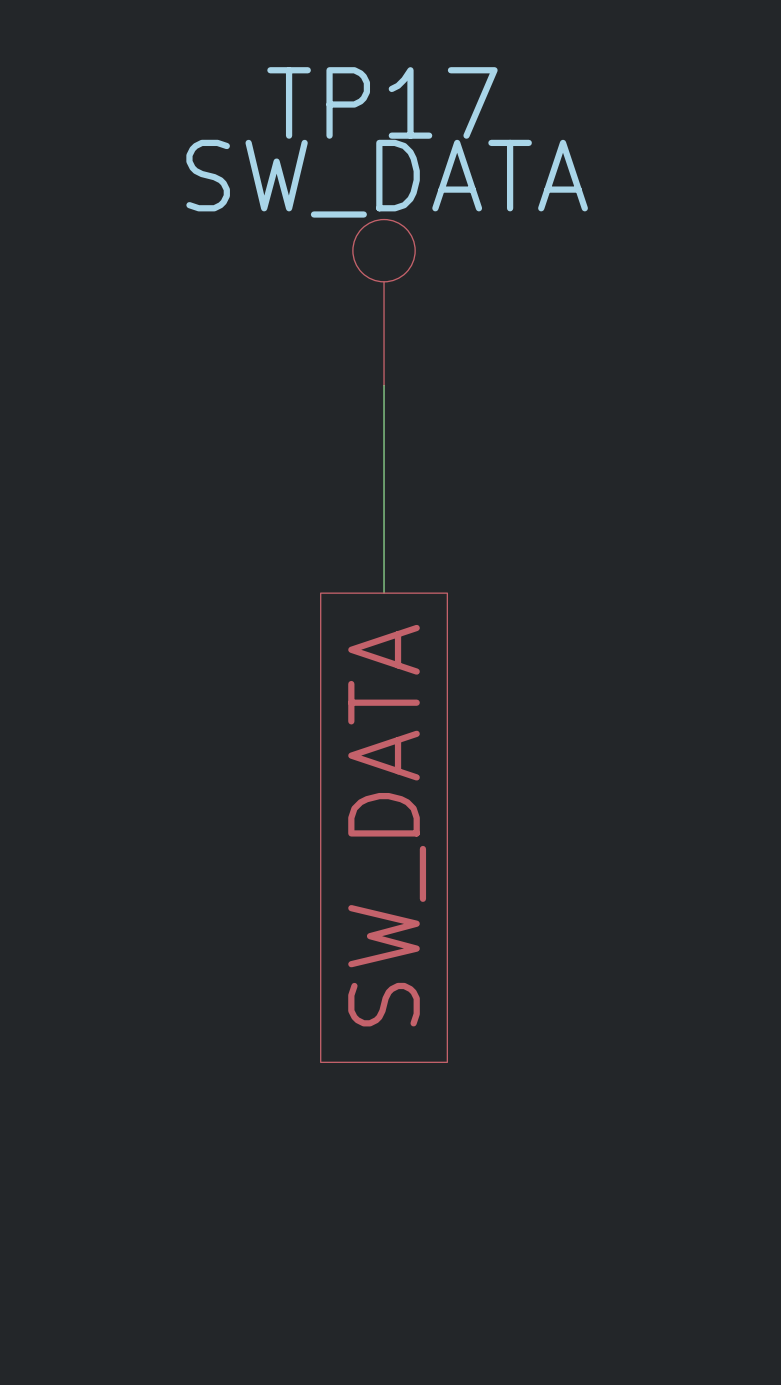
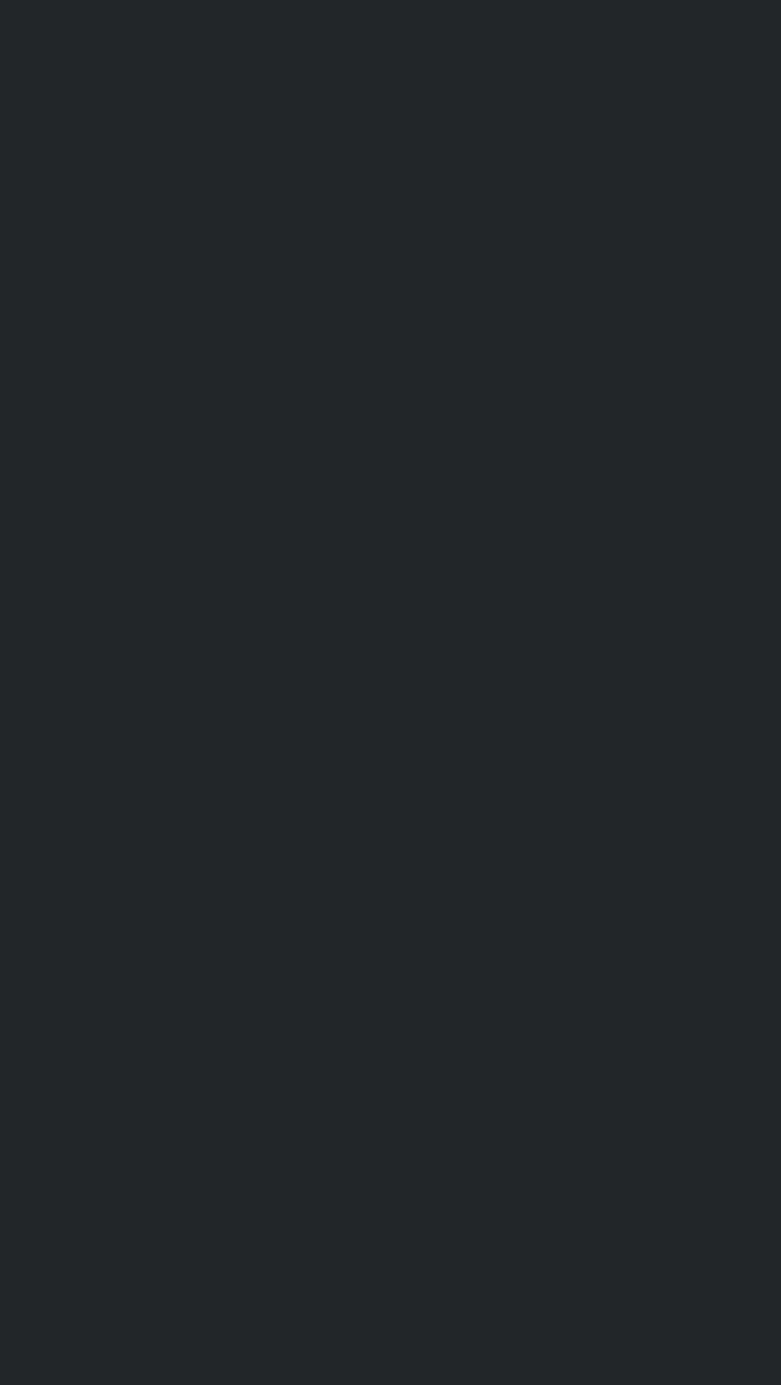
TP17: SW_DATA (384, 302) -> none
wire: (384, 385) (384, 593) -> none
global label: SW_DATA (387, 825) -> none

